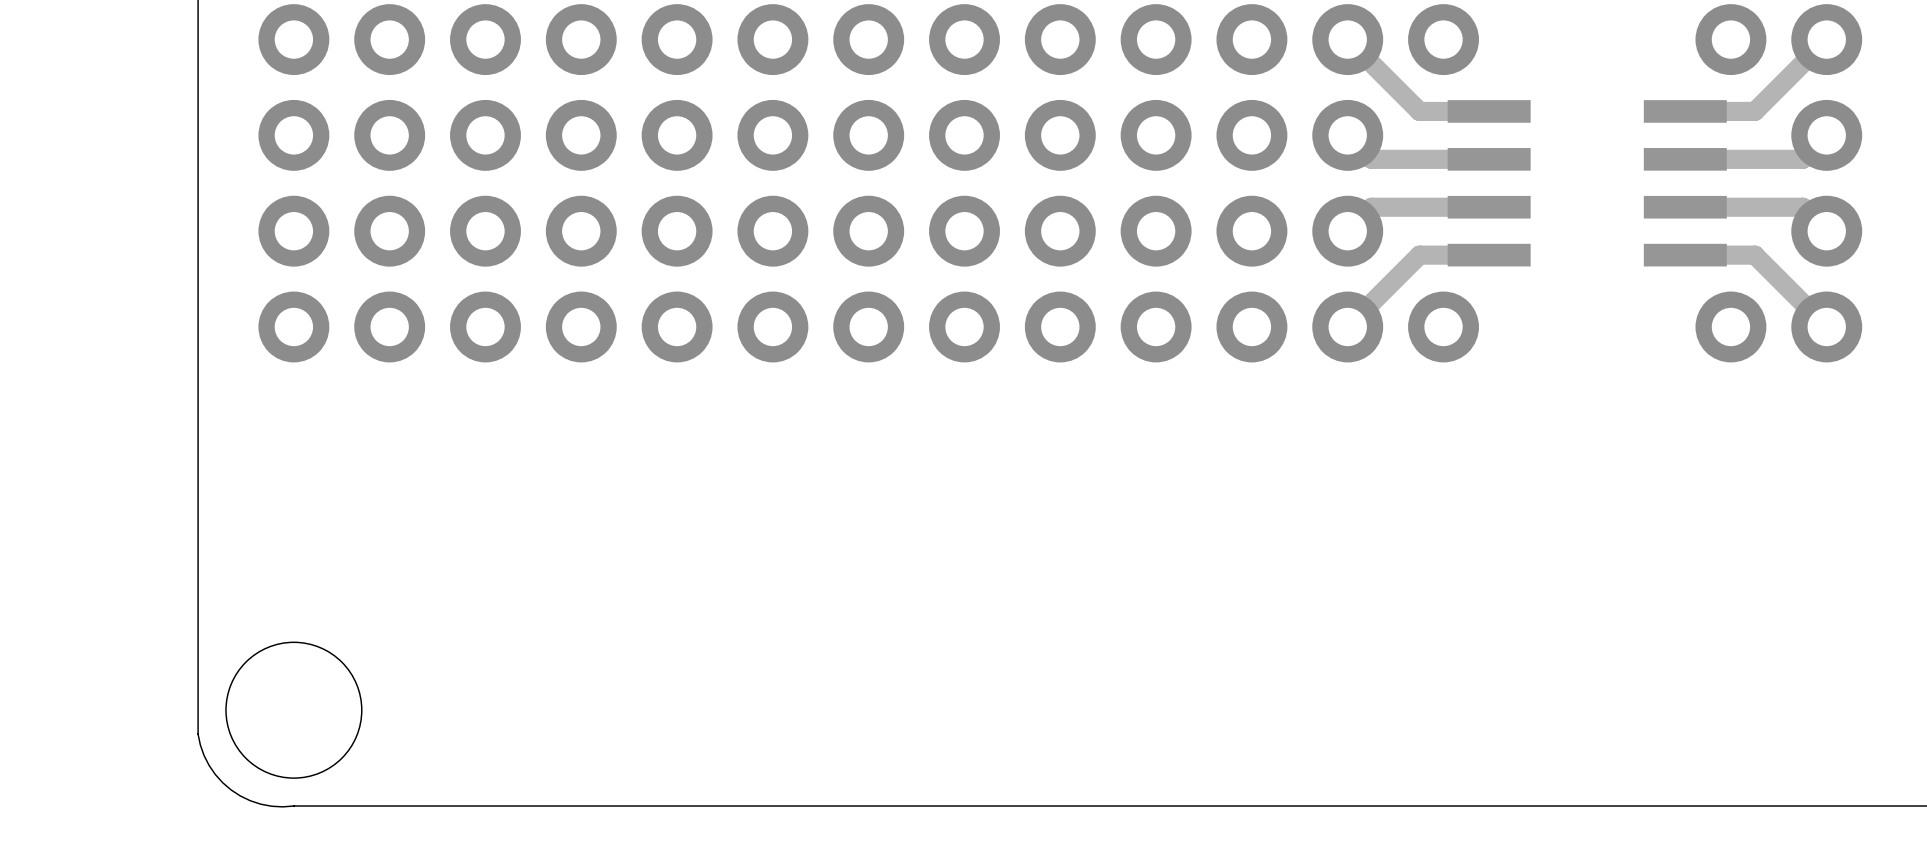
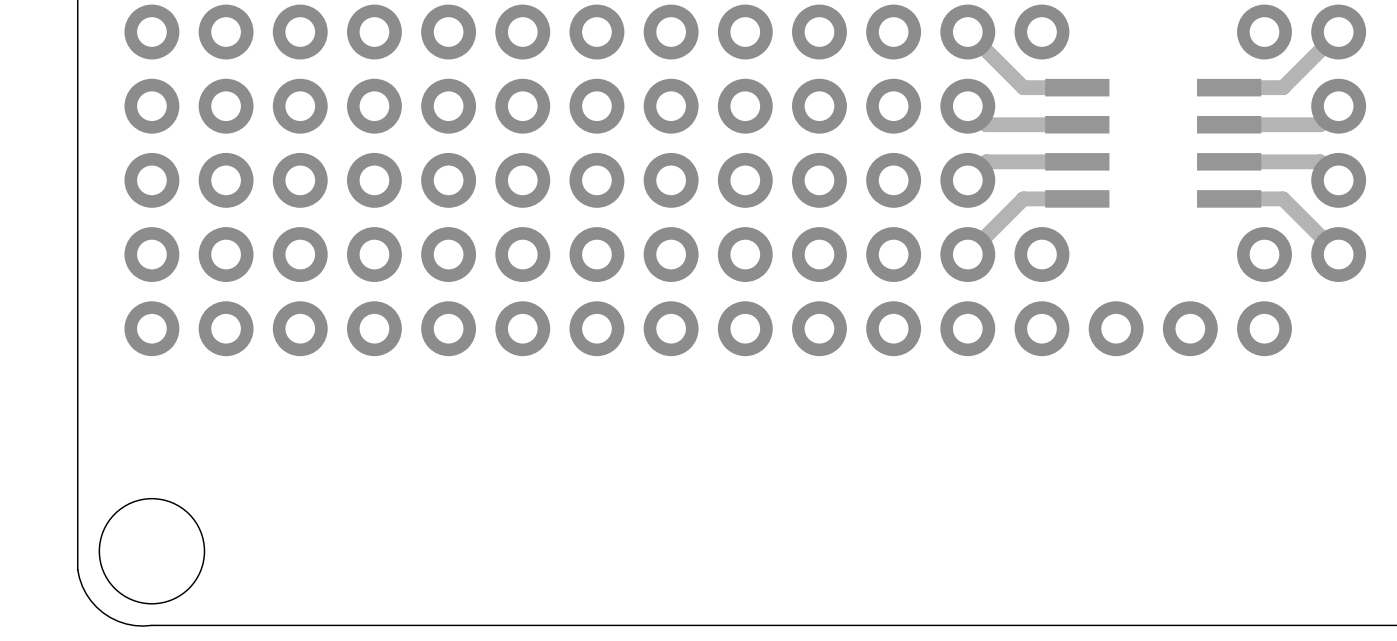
part: none -> (708, 328)

